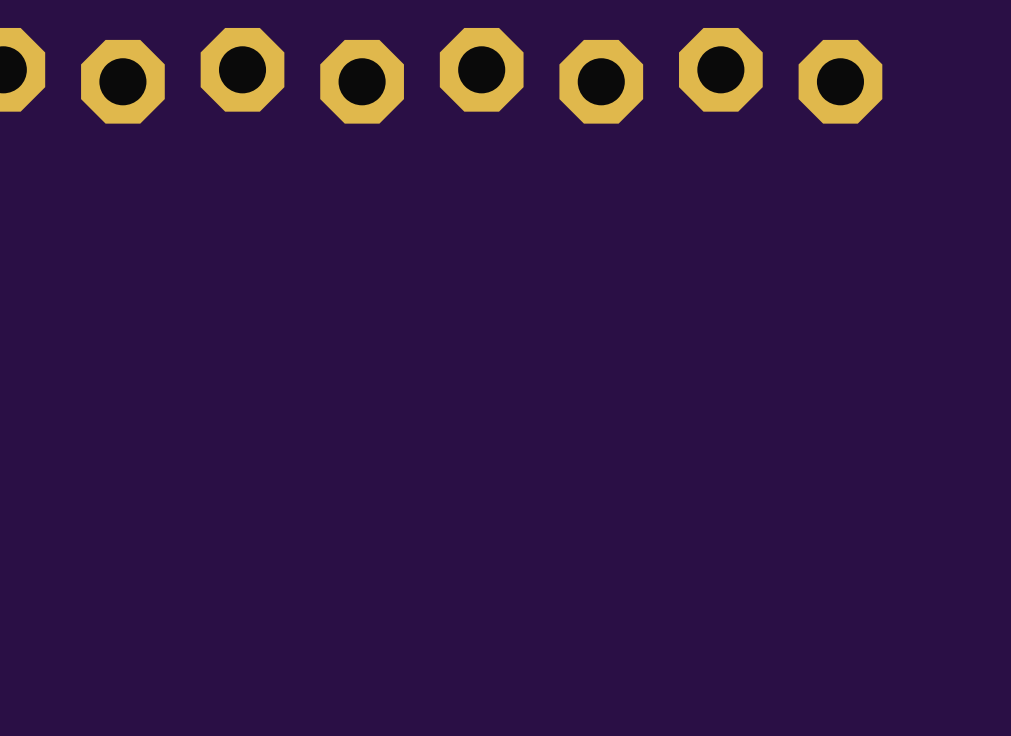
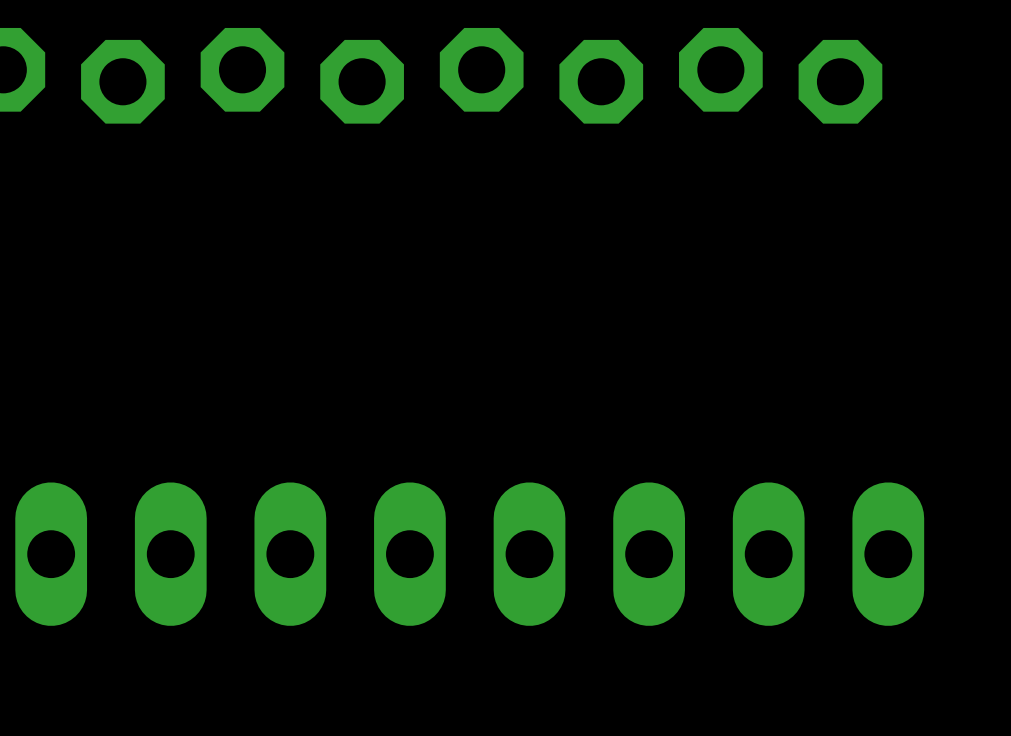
part: none -> (469, 554)

